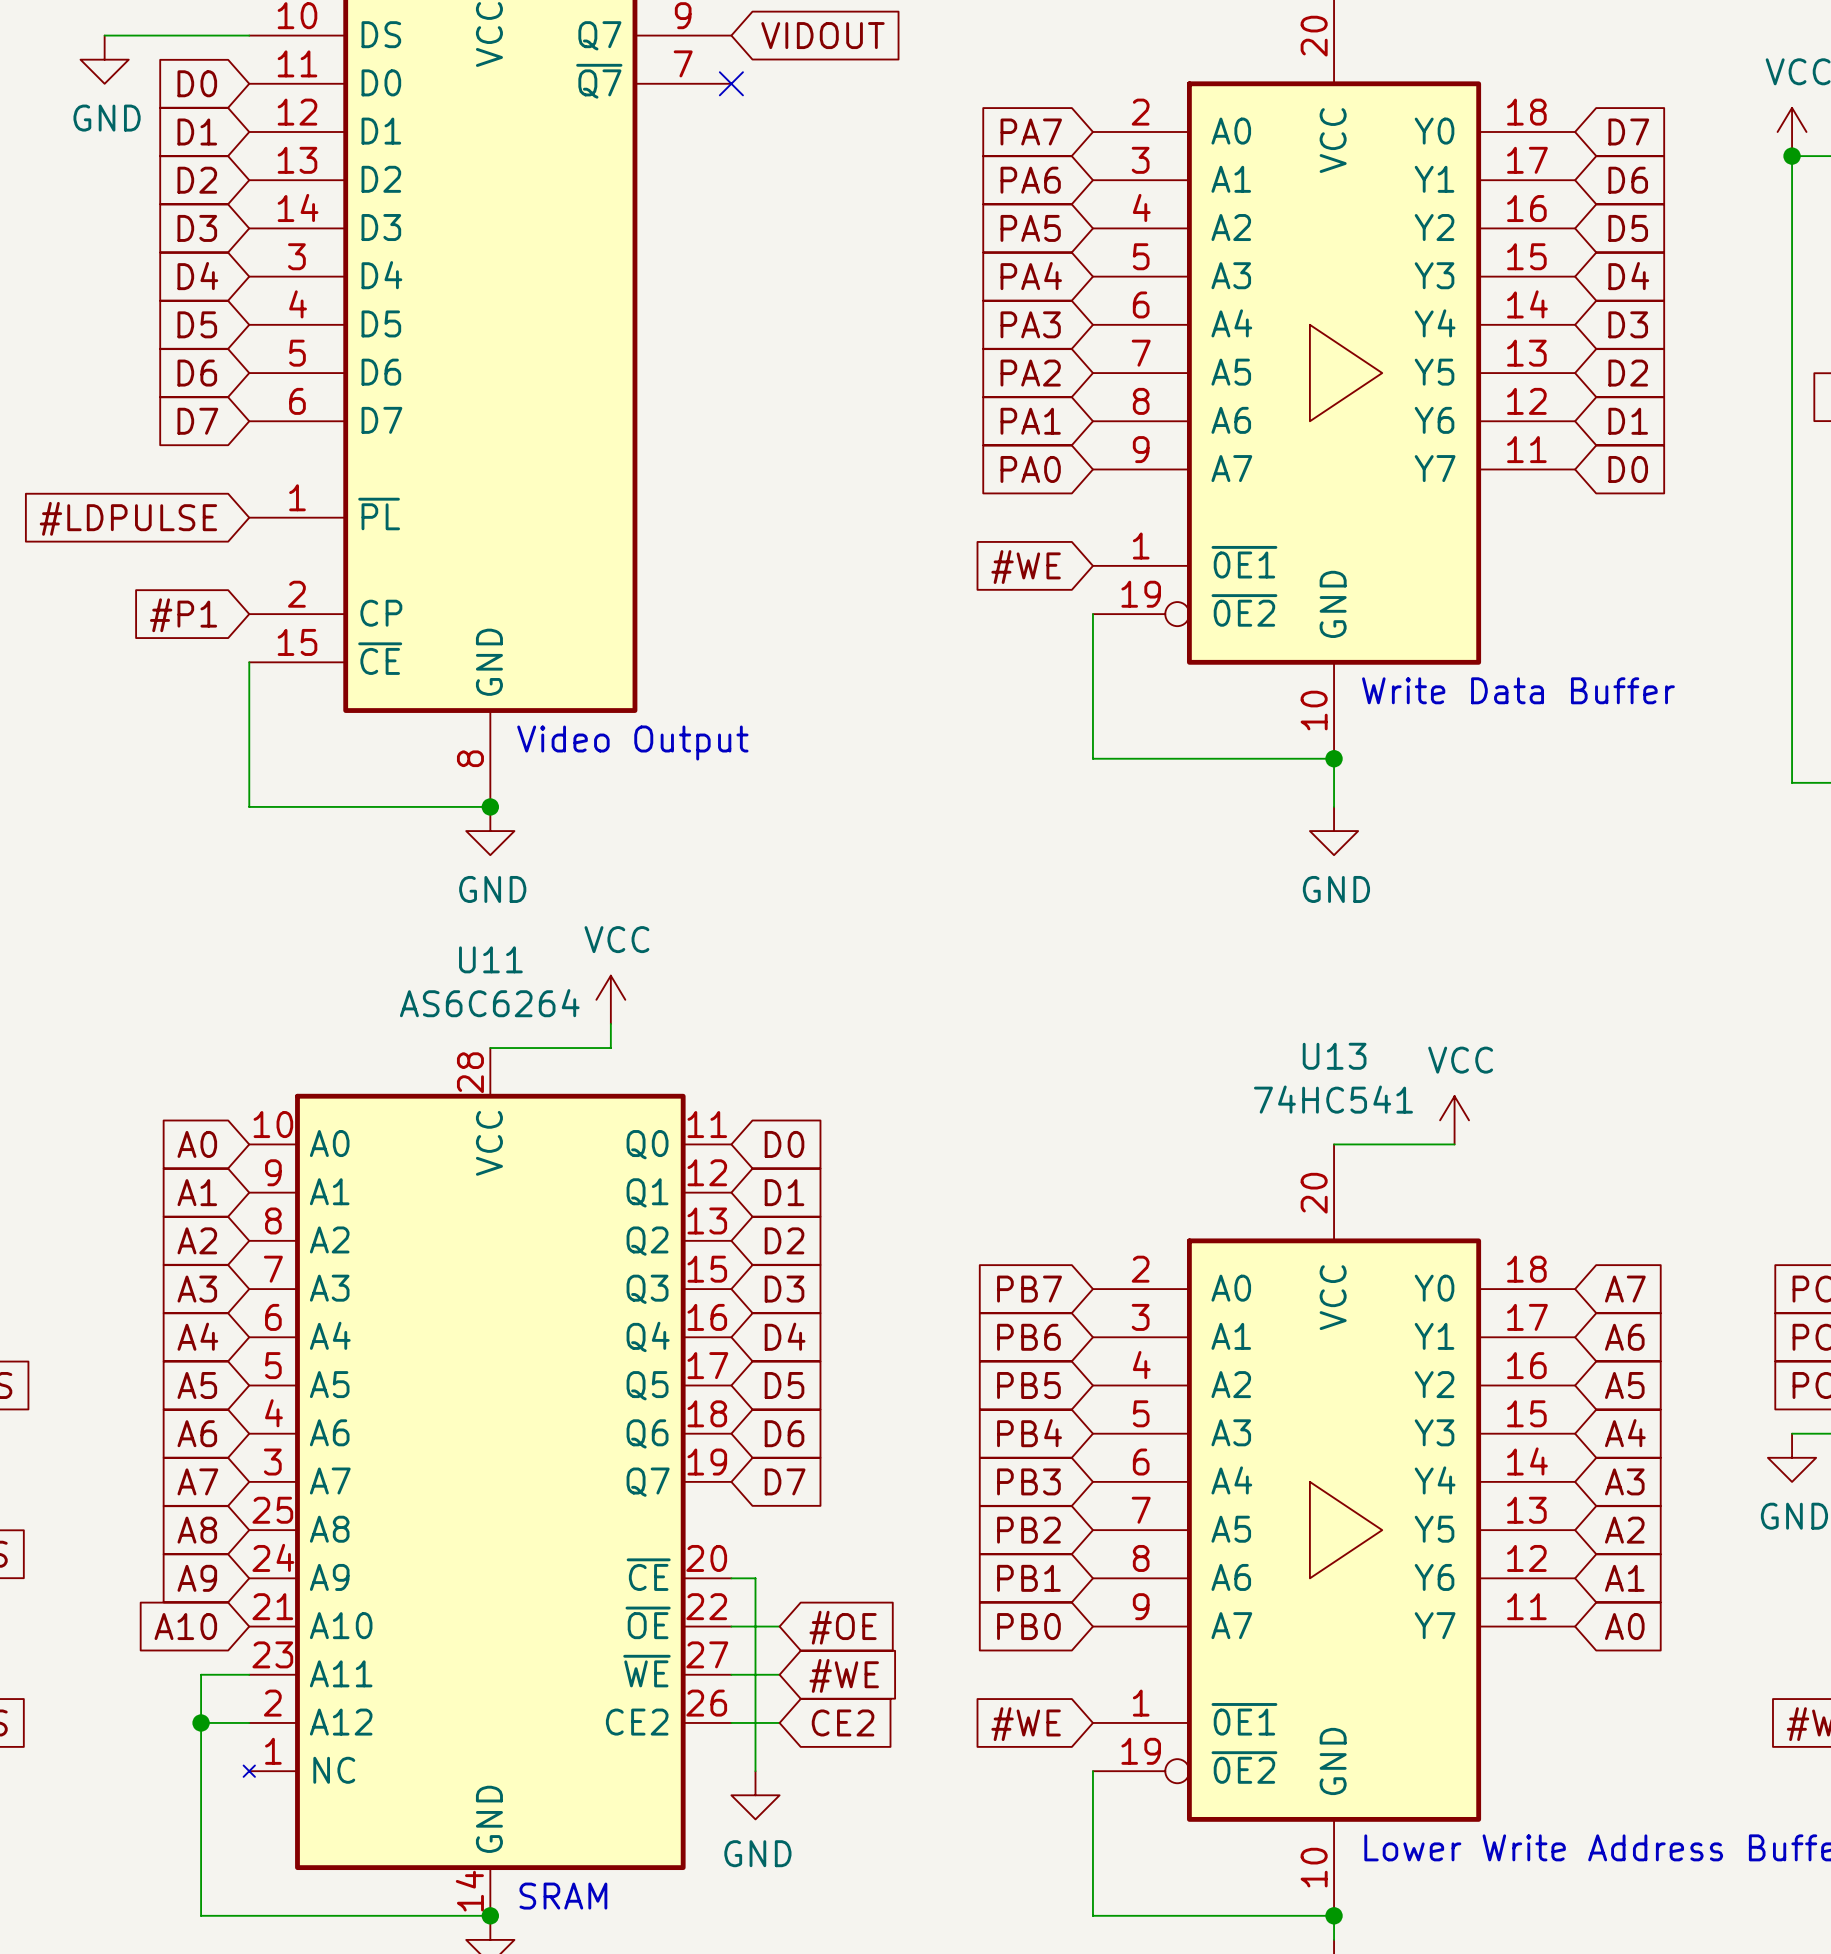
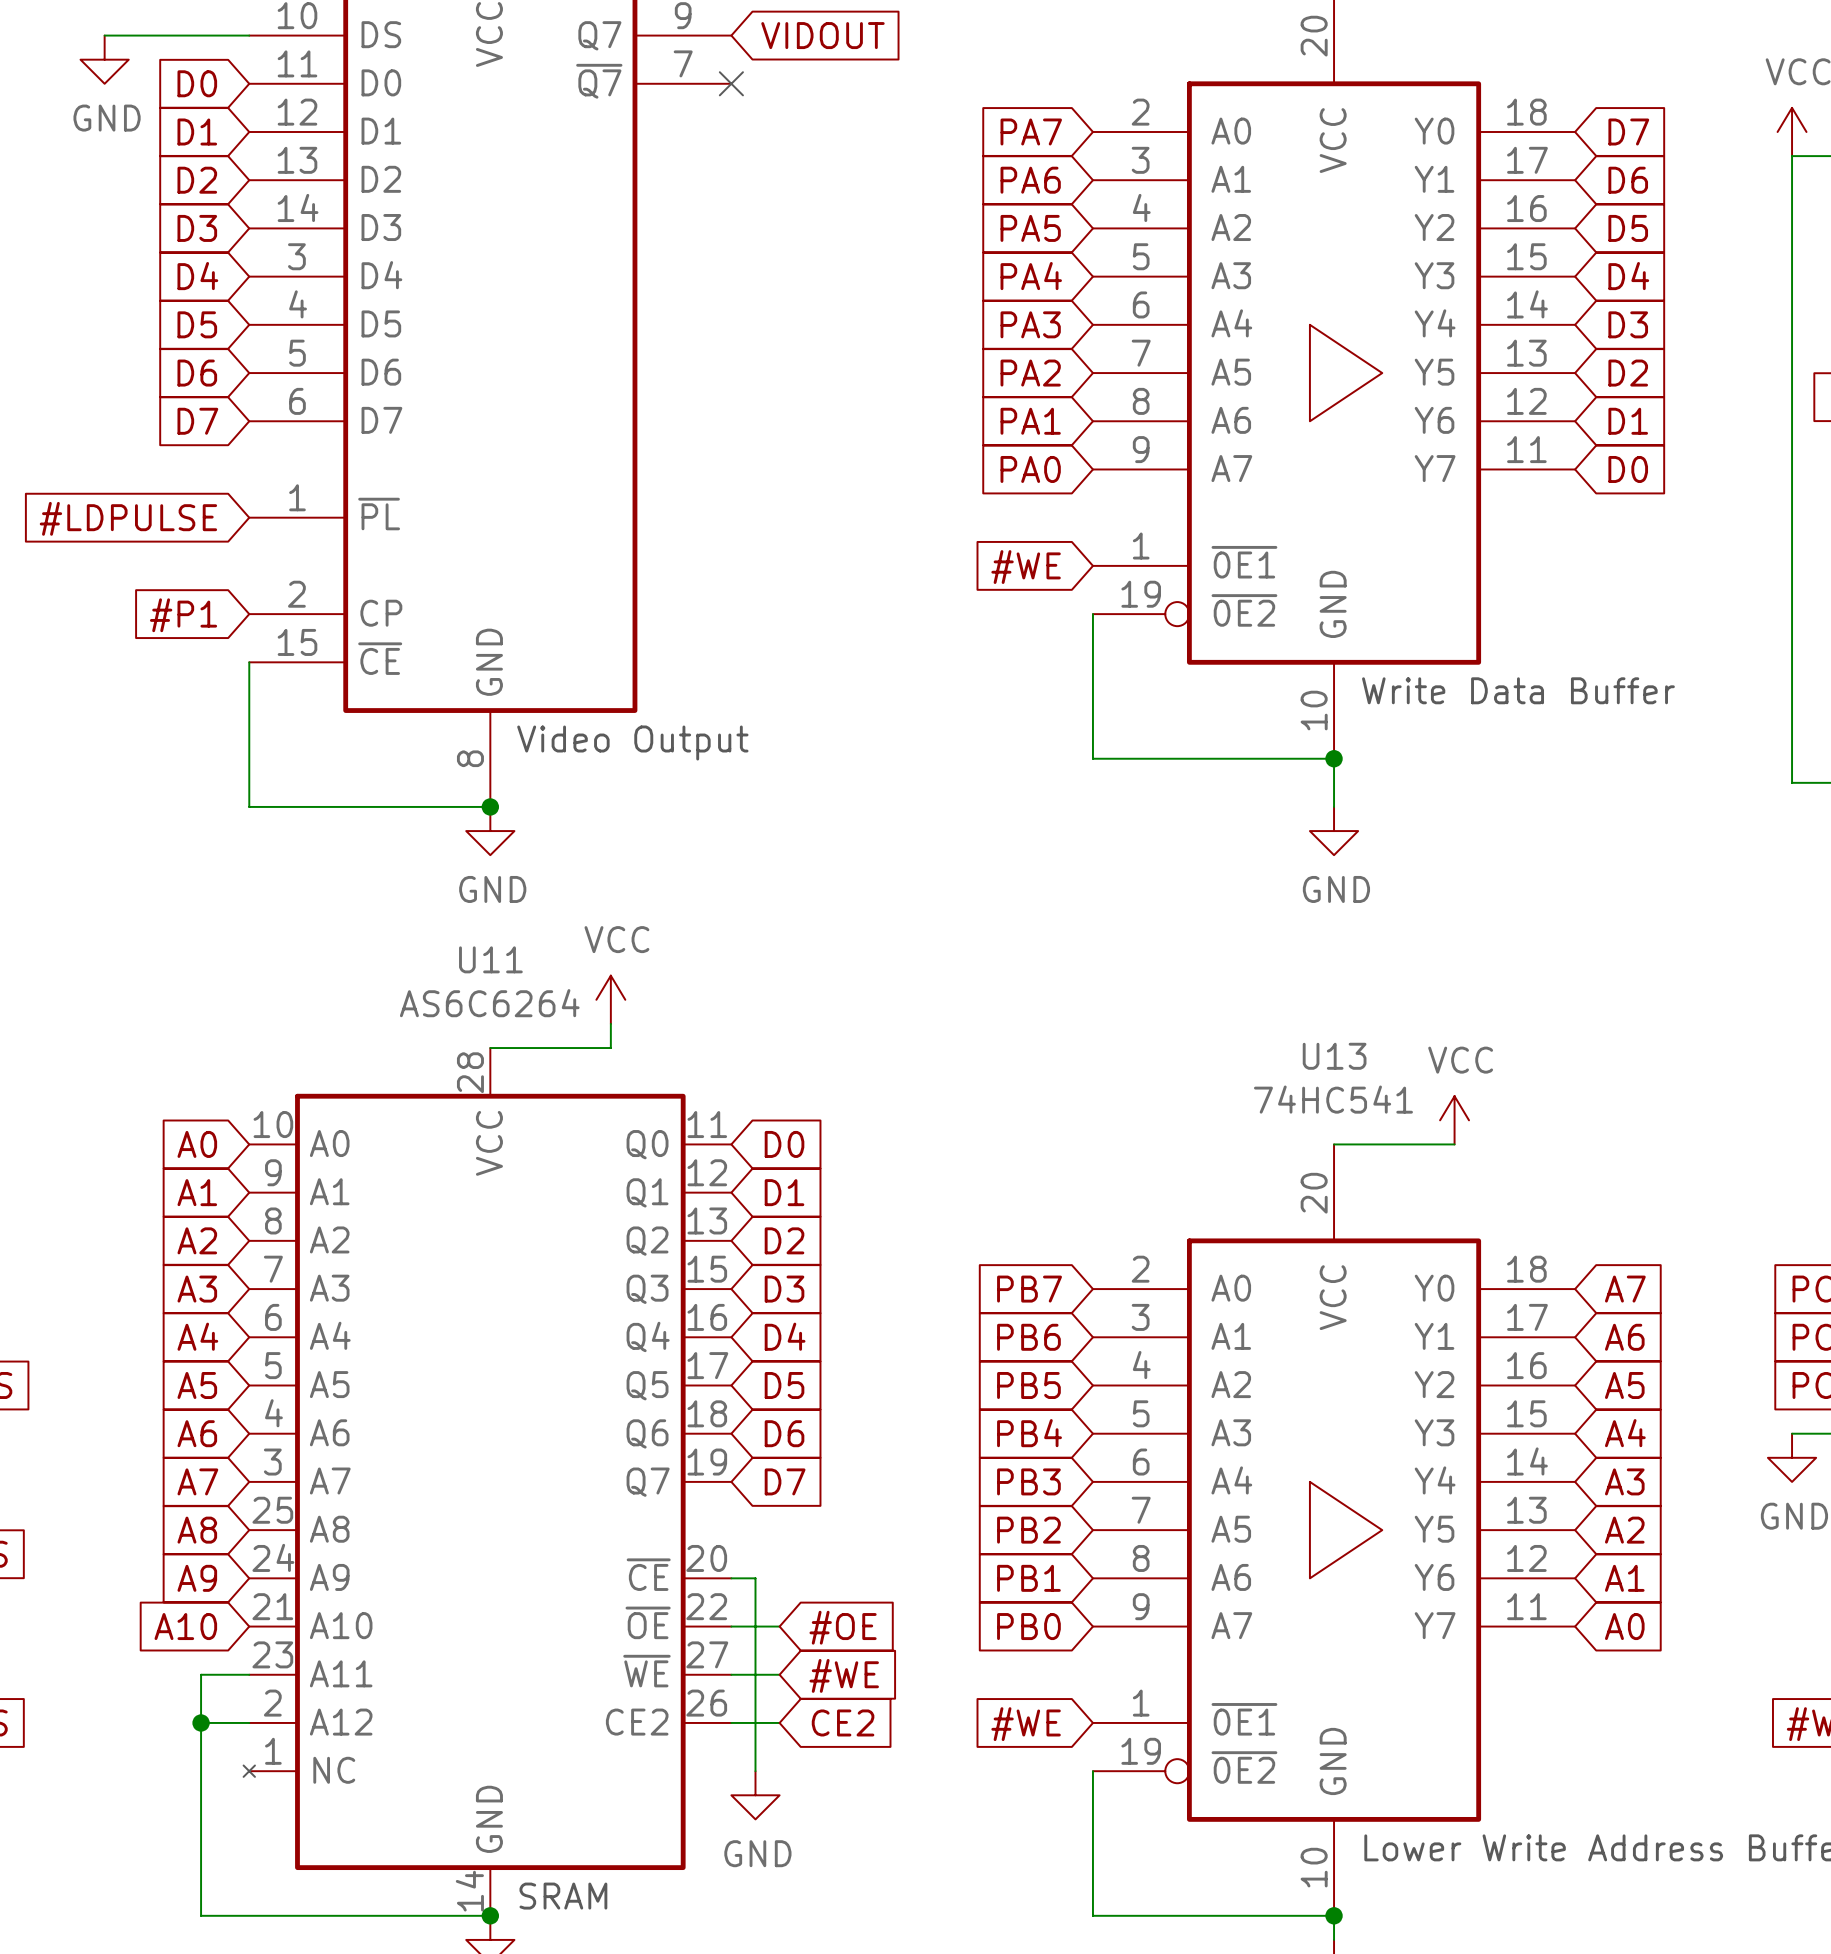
junction: (1792, 156) -> none

